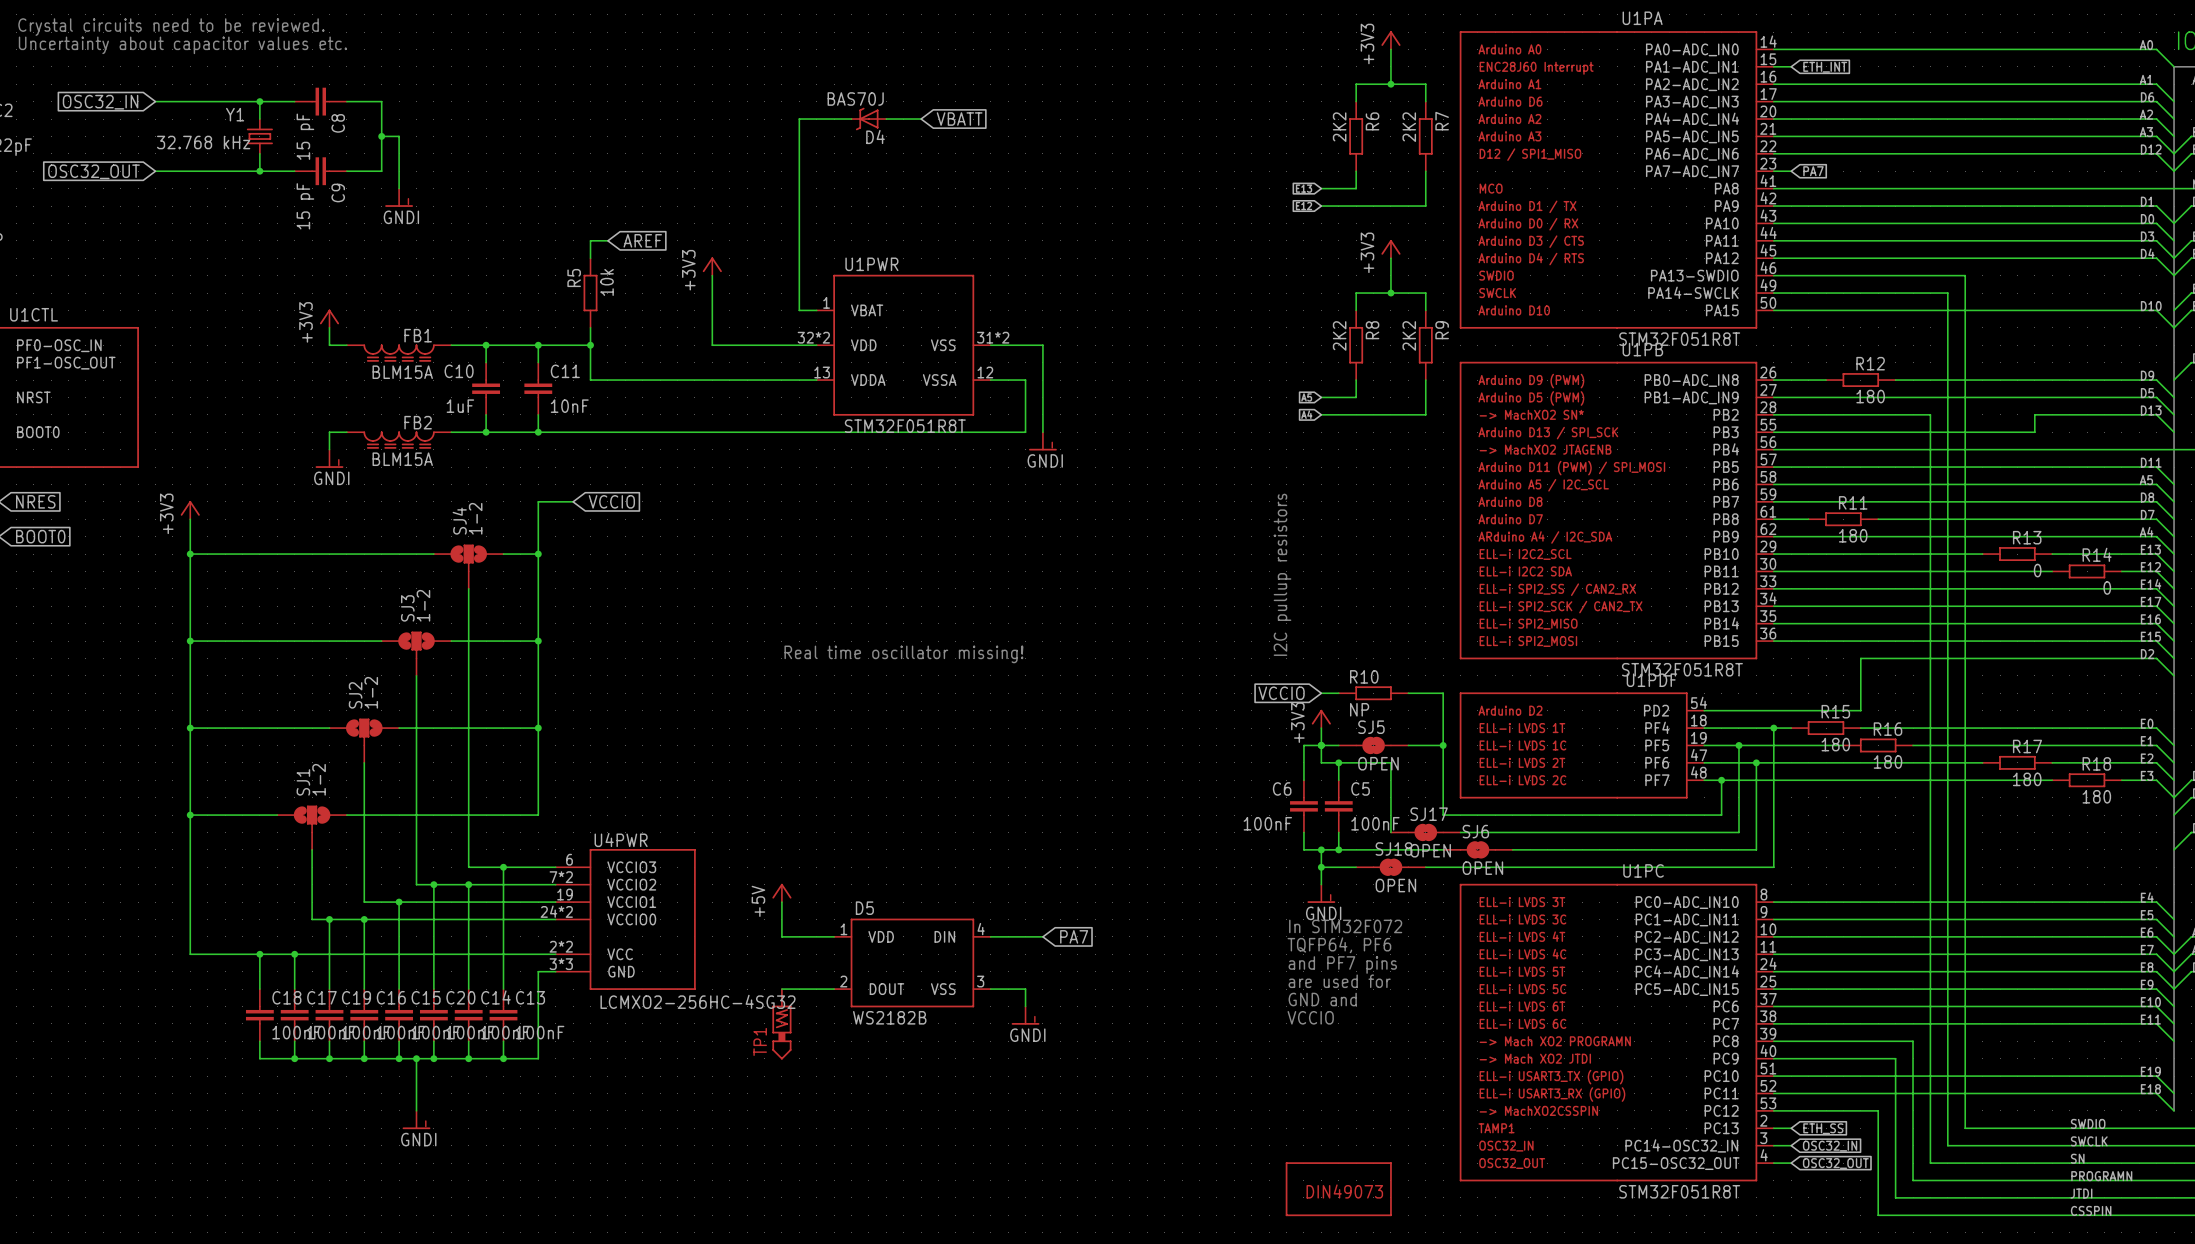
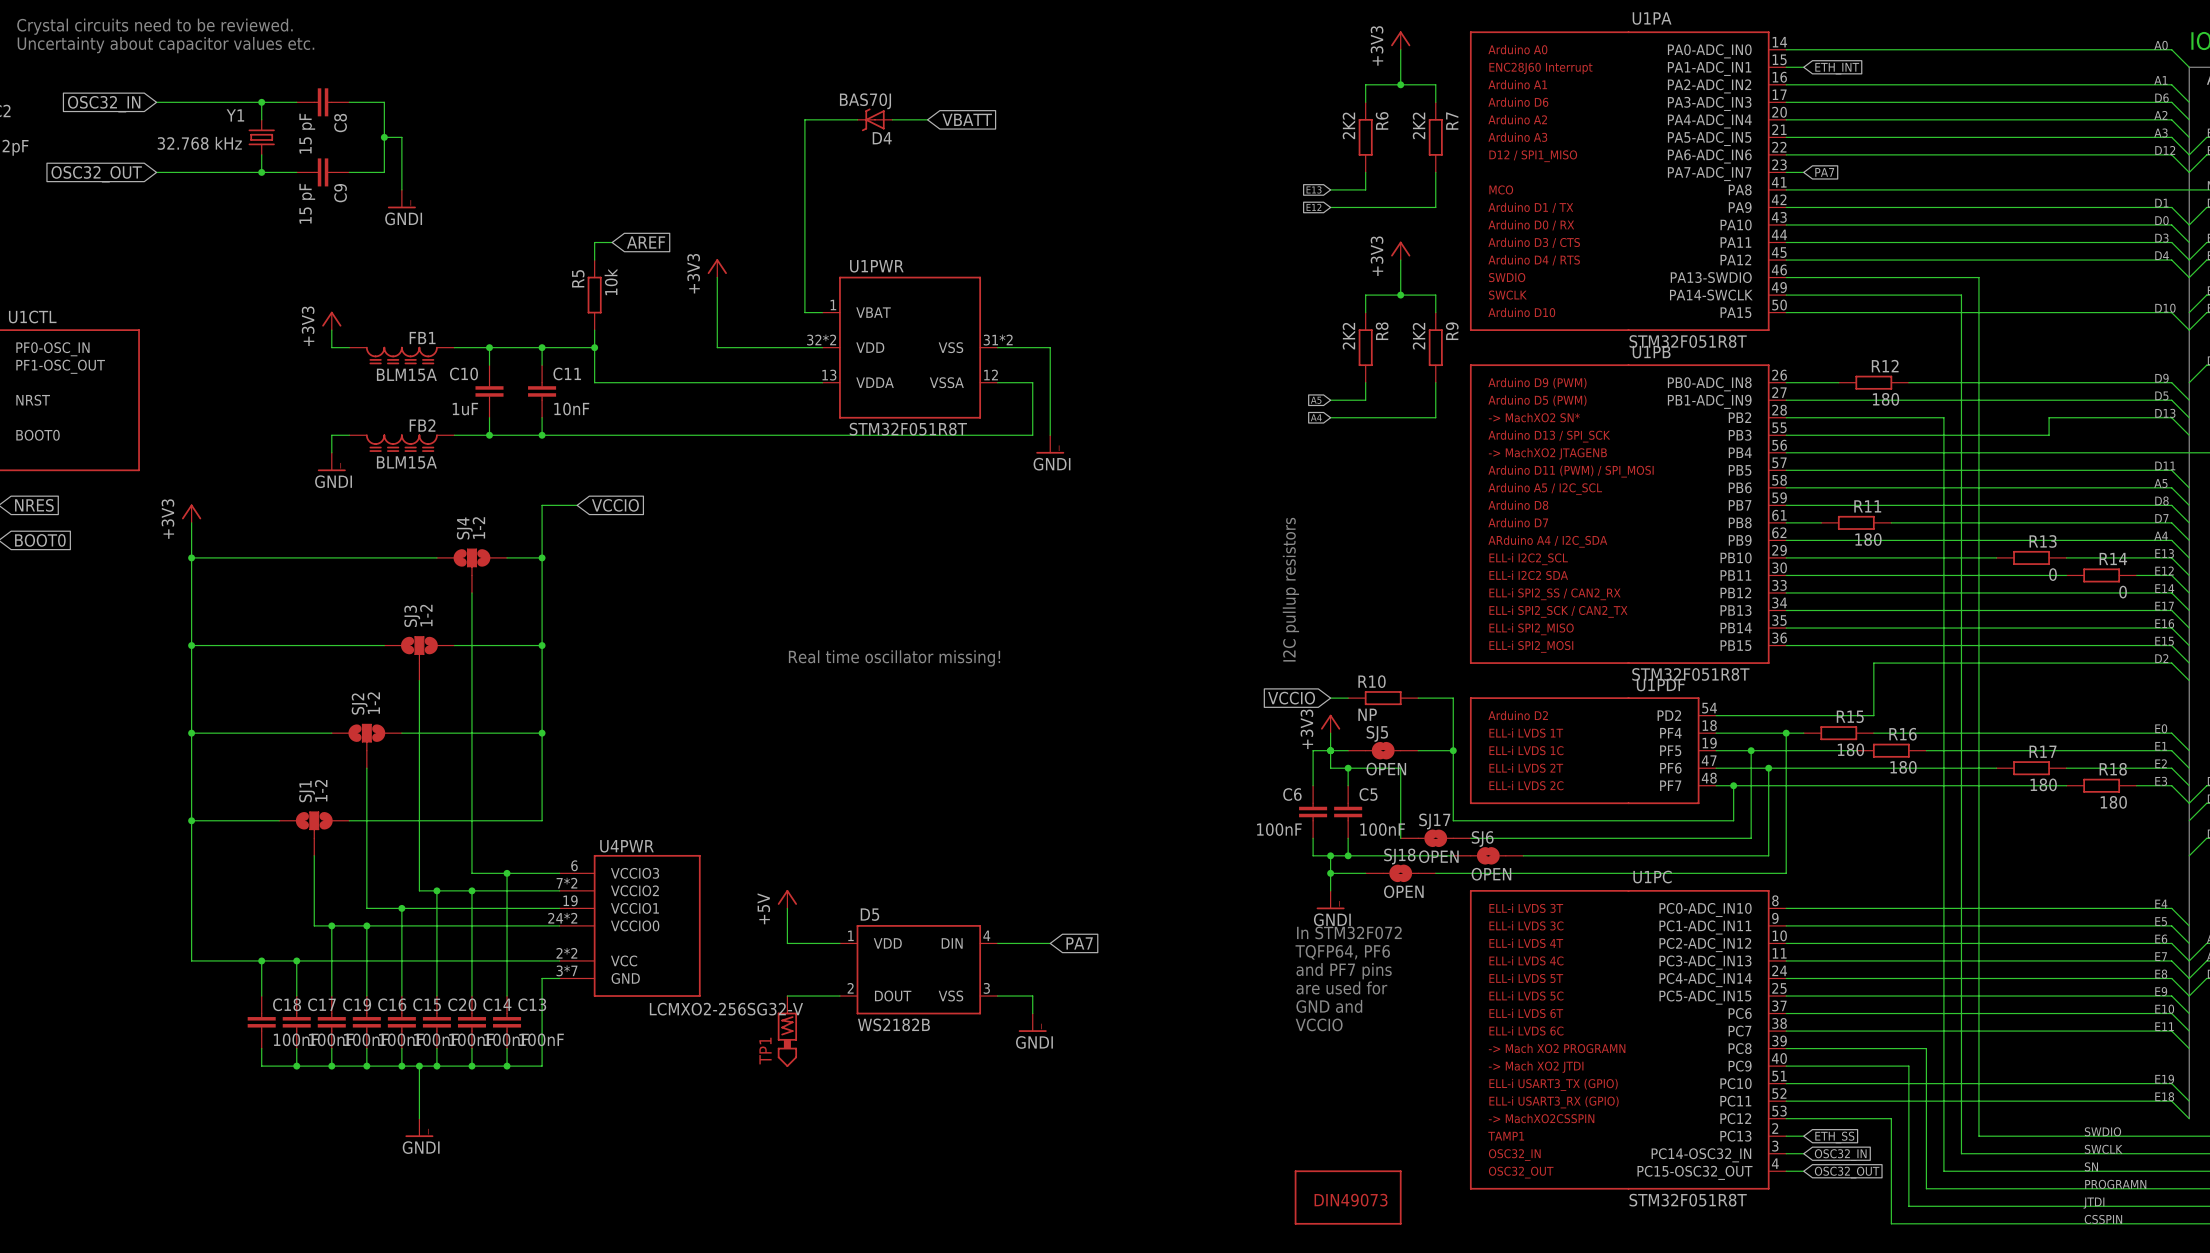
U4PWR pin number: 3*3 (561, 964) -> 3*7 (567, 970)
U4PWR value: LCMXO2-256HC-4SG32 (698, 1001) -> LCMXO2-256SG32-V (726, 1009)

